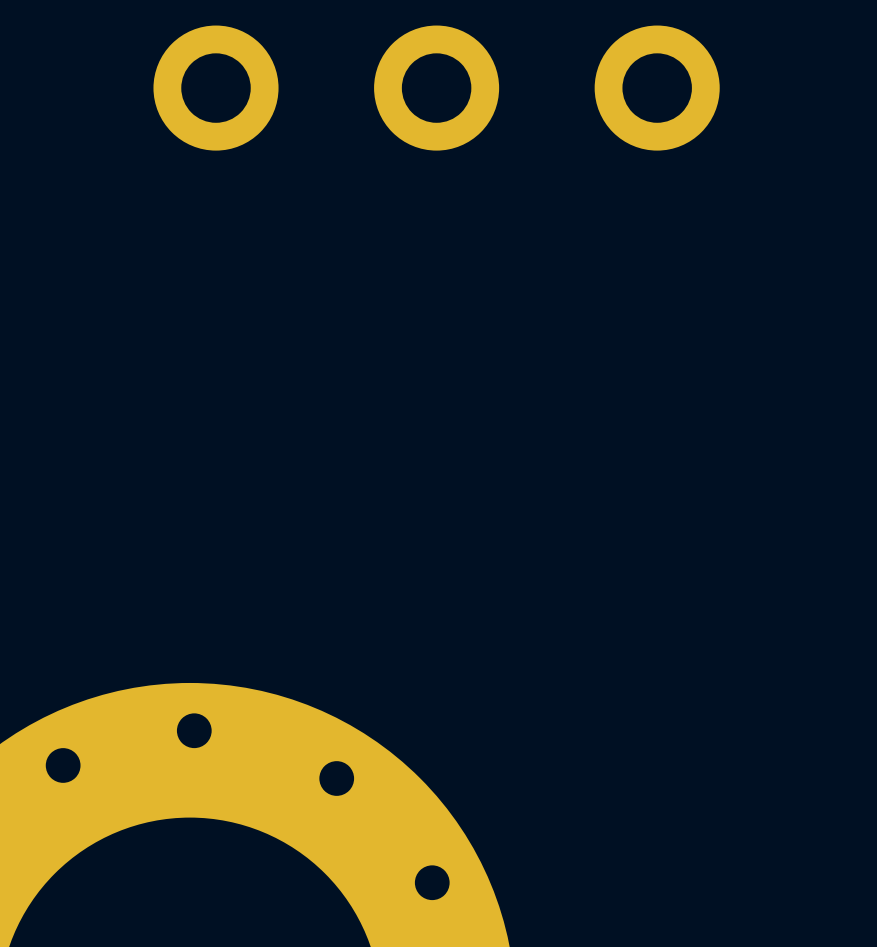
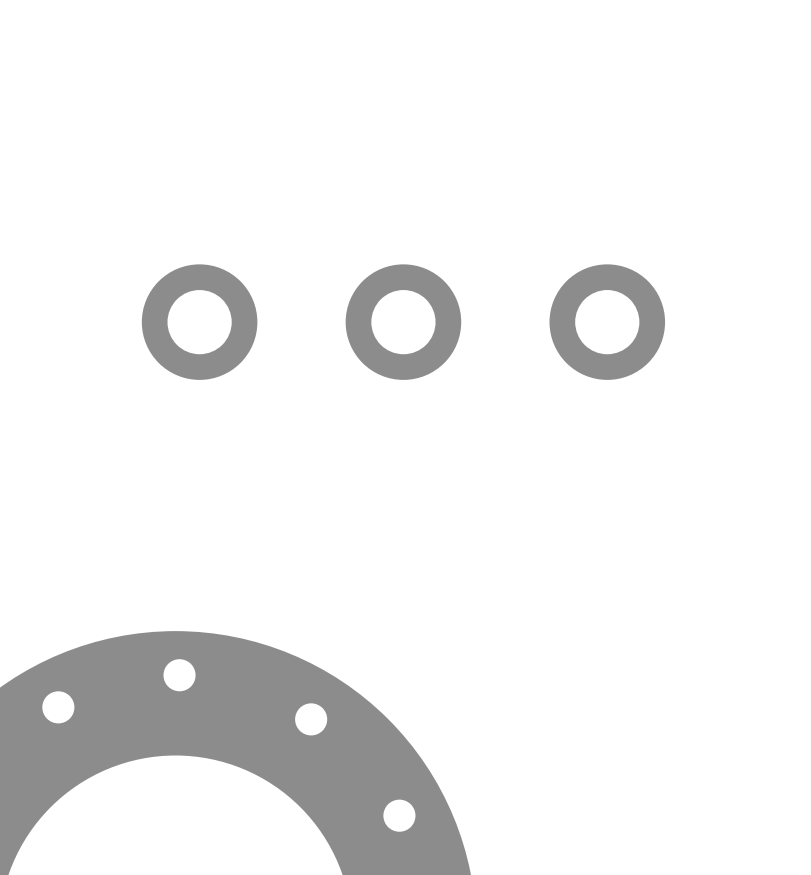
part position: (436, 88) -> (403, 322)

